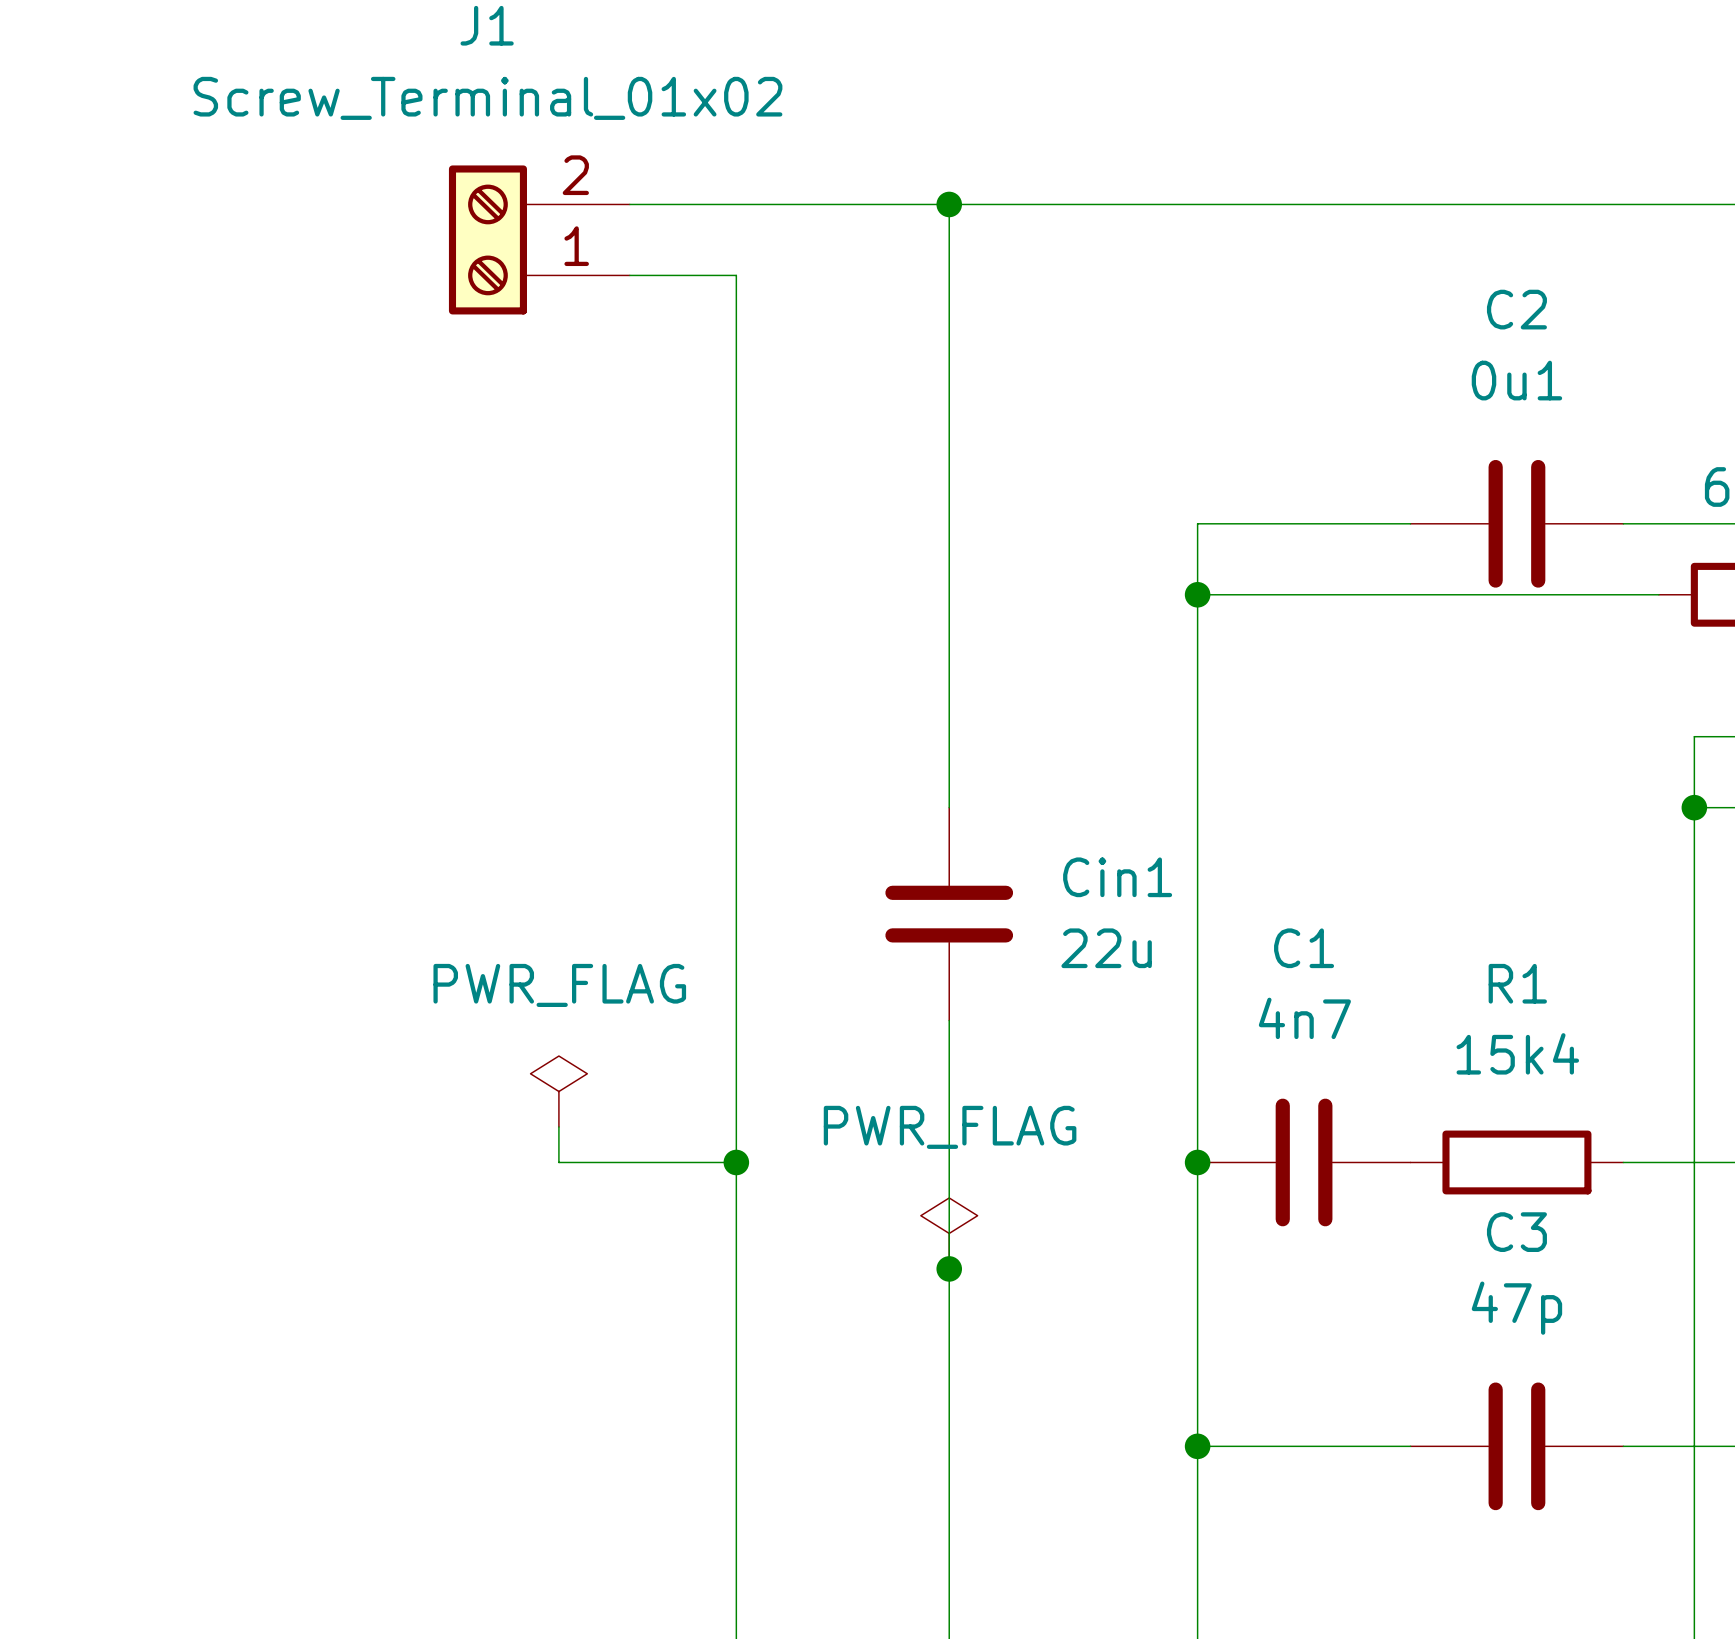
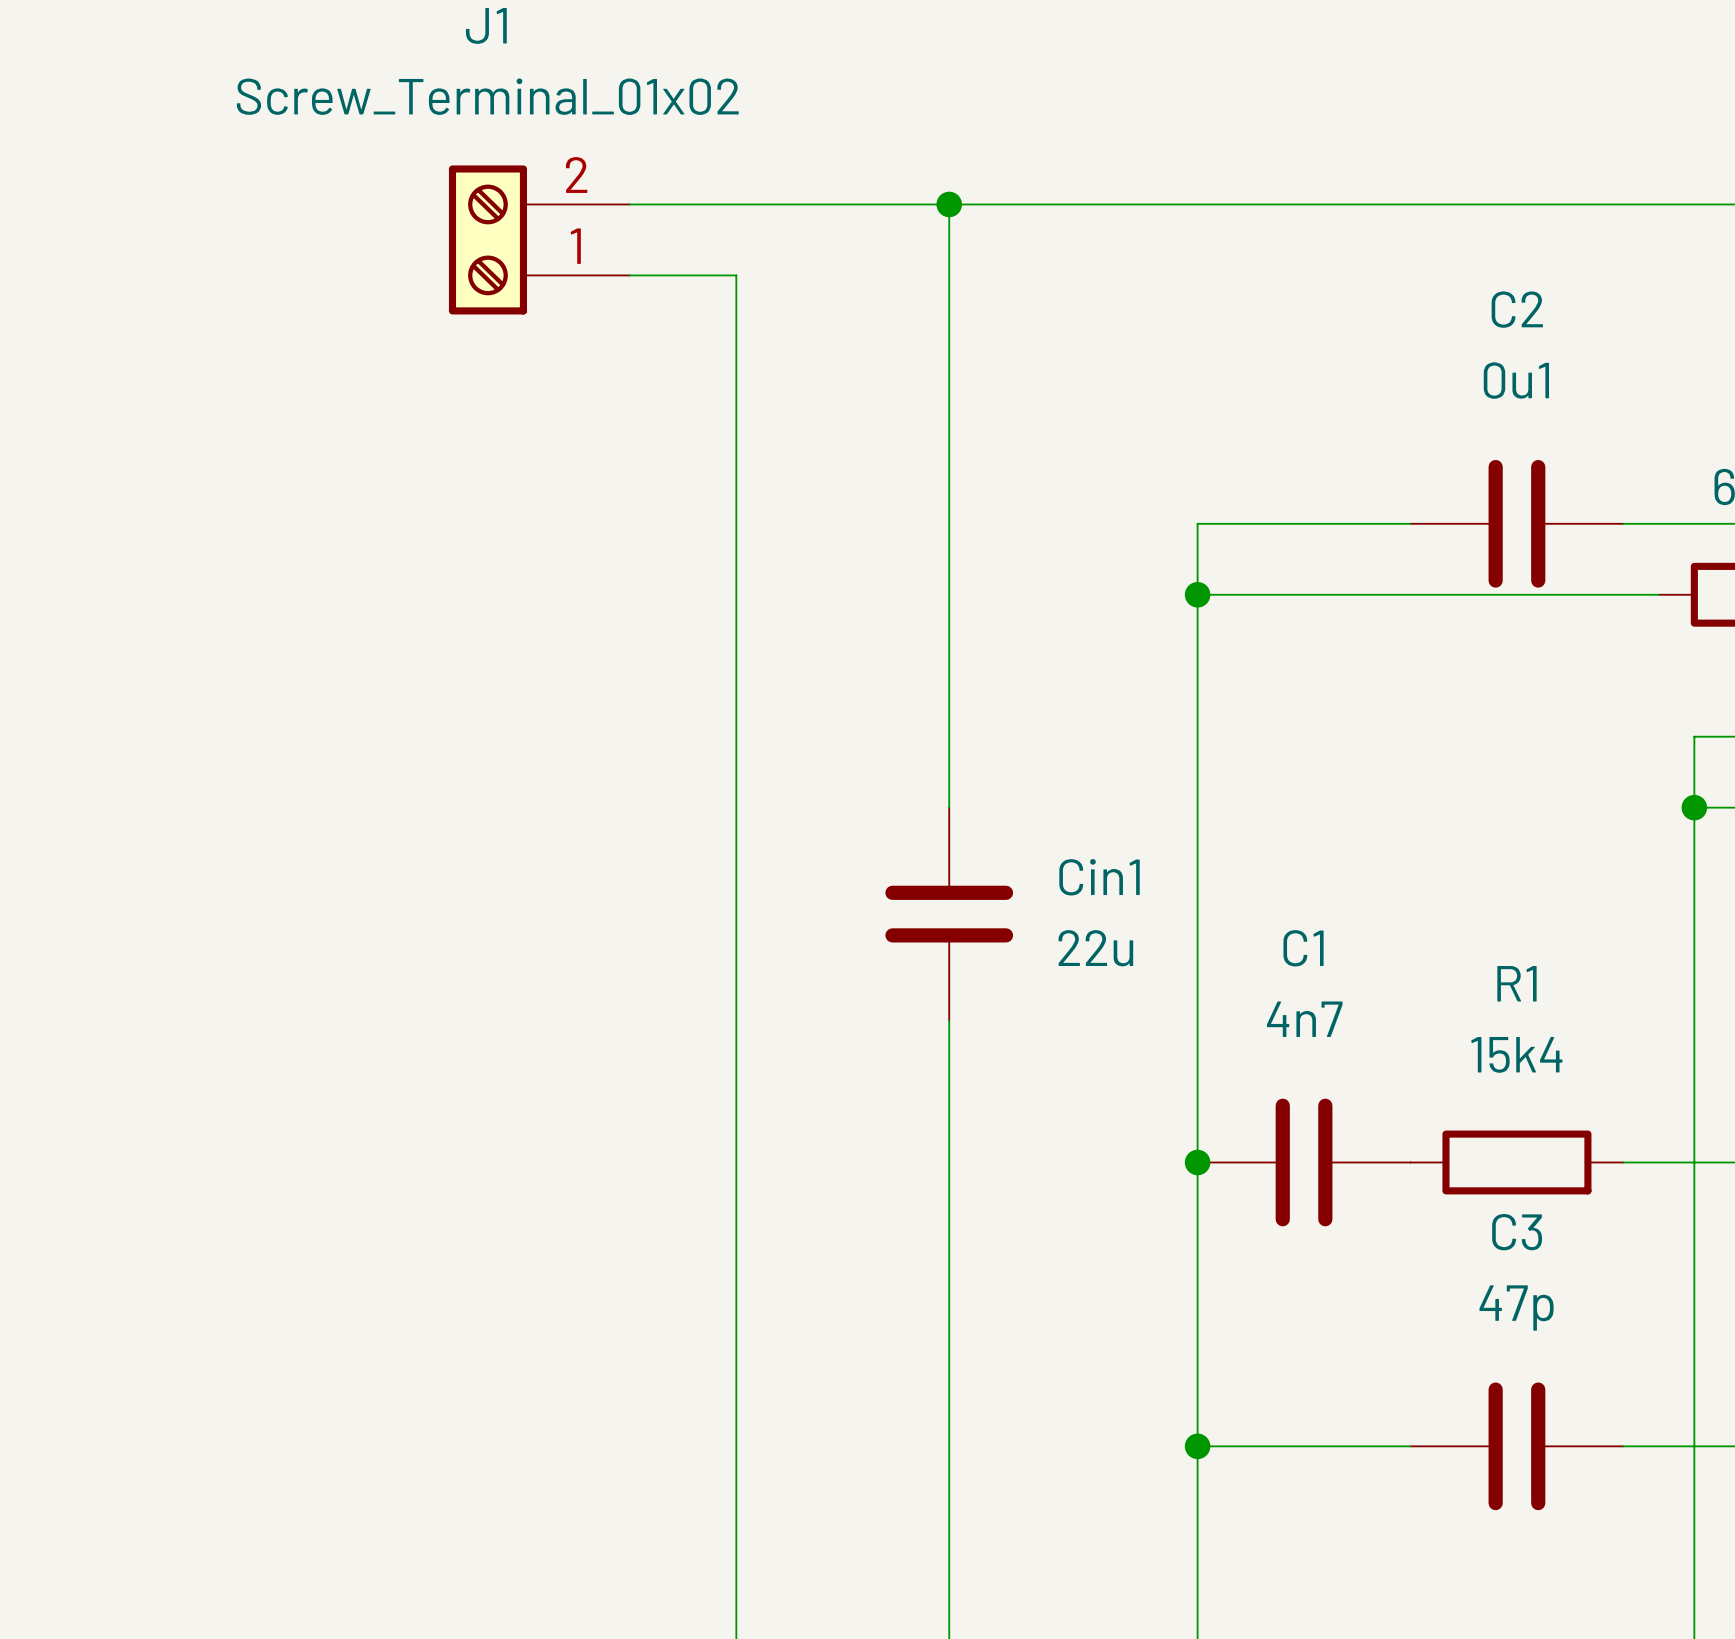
power symbol: PWR_FLAG (558, 1091) -> none
wire: (558, 1127) (558, 1162) (736, 1162) -> none
junction: (736, 1162) -> none
power symbol: PWR_FLAG (949, 1233) -> none
junction: (949, 1268) -> none

